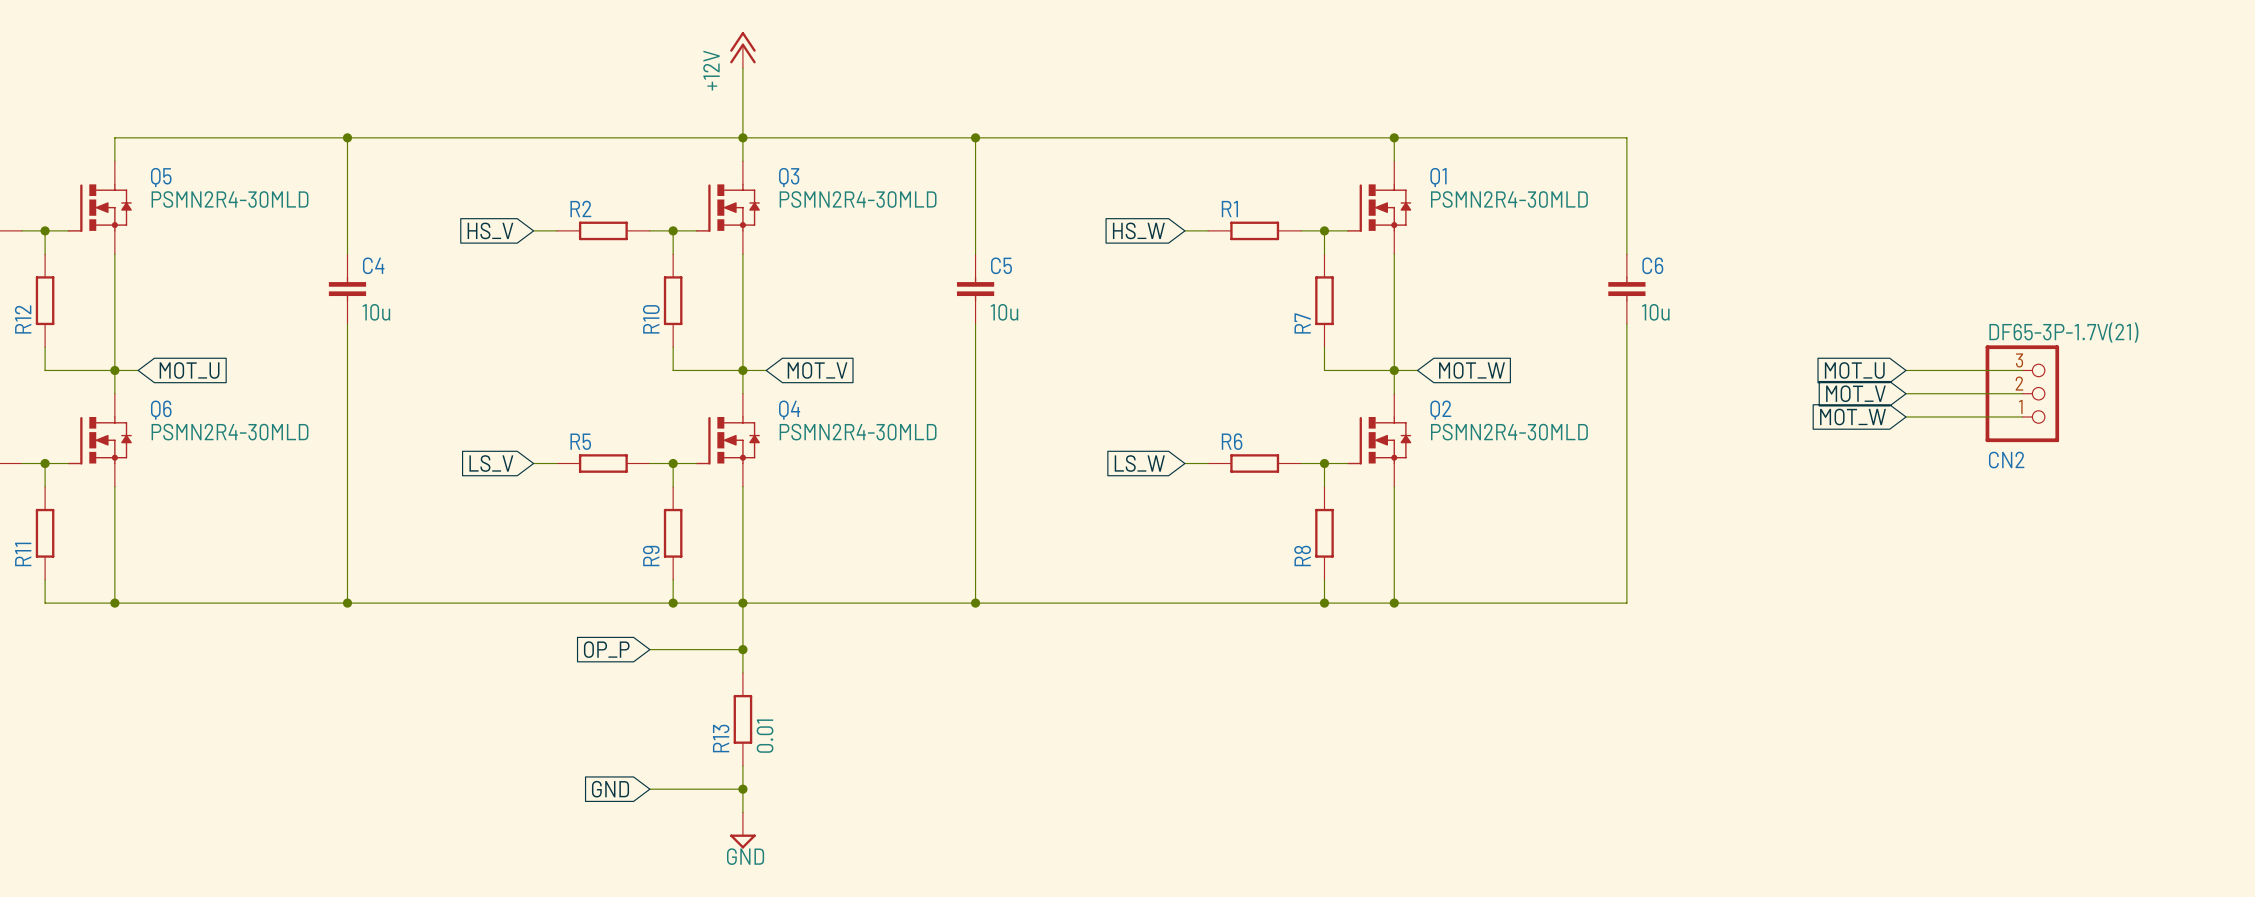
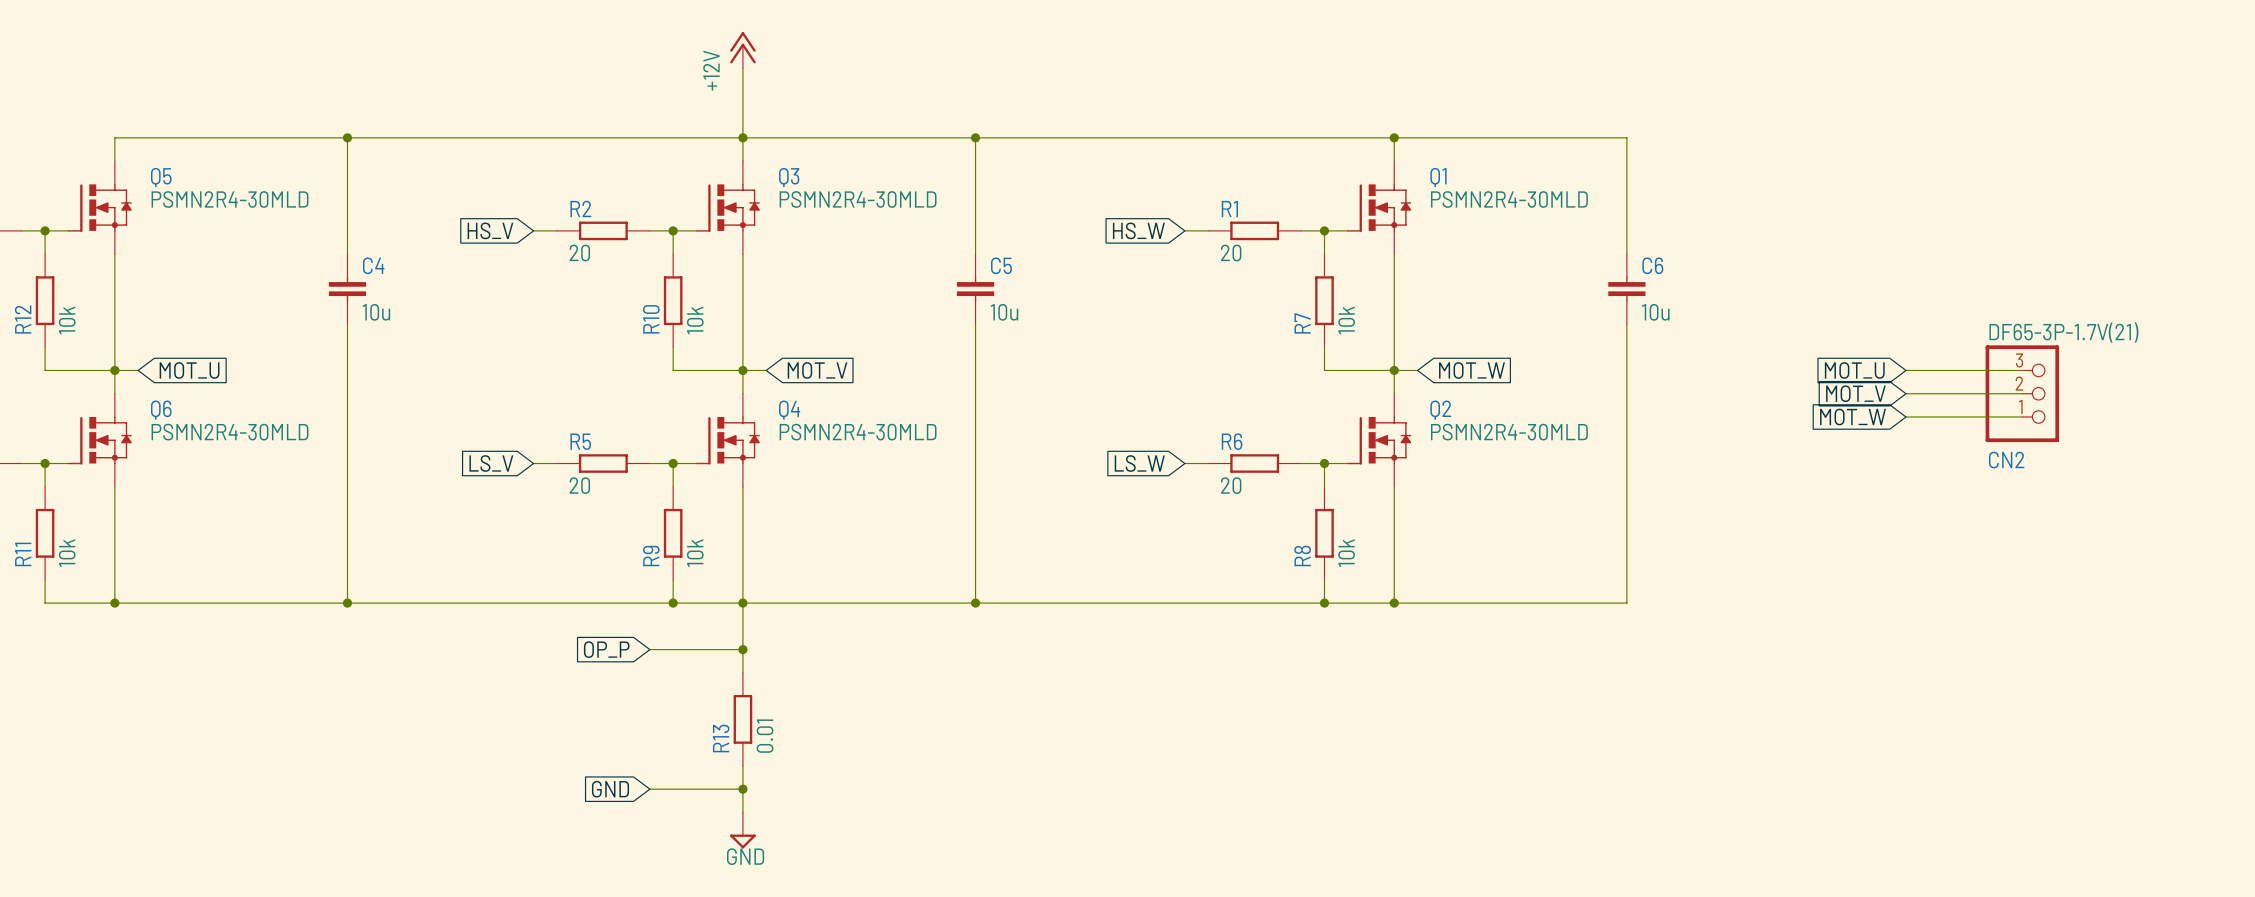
R2 value: none -> 20 (579, 253)
R1 value: none -> 20 (1231, 253)
R12 value: none -> 10k (67, 320)
R10 value: none -> 10k (695, 320)
R7 value: none -> 10k (1346, 320)
R5 value: none -> 20 (579, 485)
R6 value: none -> 20 (1231, 485)
R11 value: none -> 10k (67, 553)
R9 value: none -> 10k (695, 553)
R8 value: none -> 10k (1346, 553)

